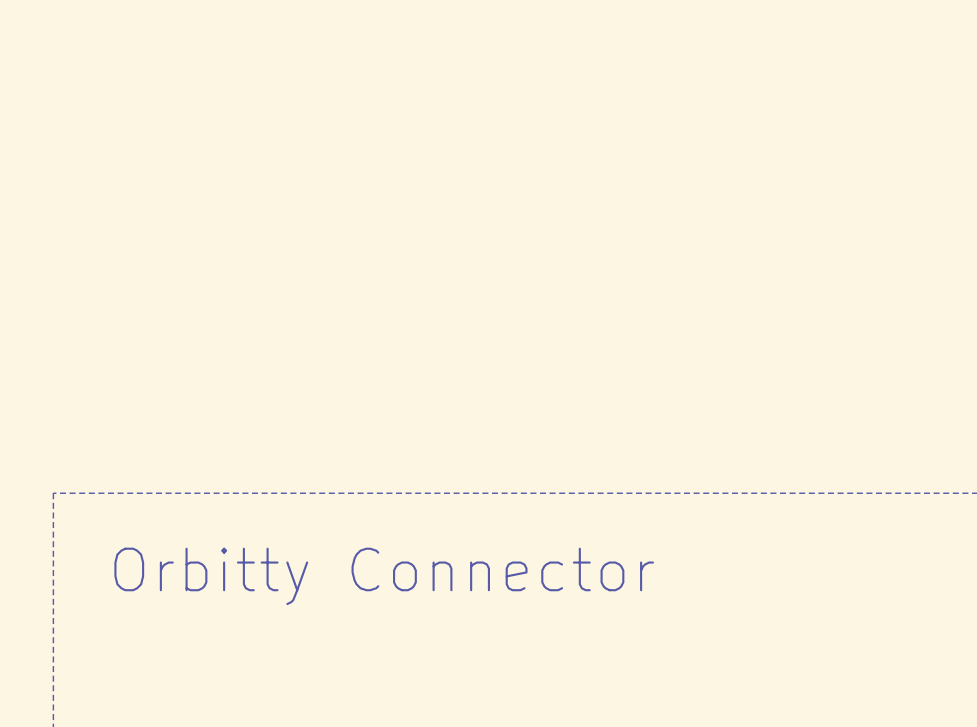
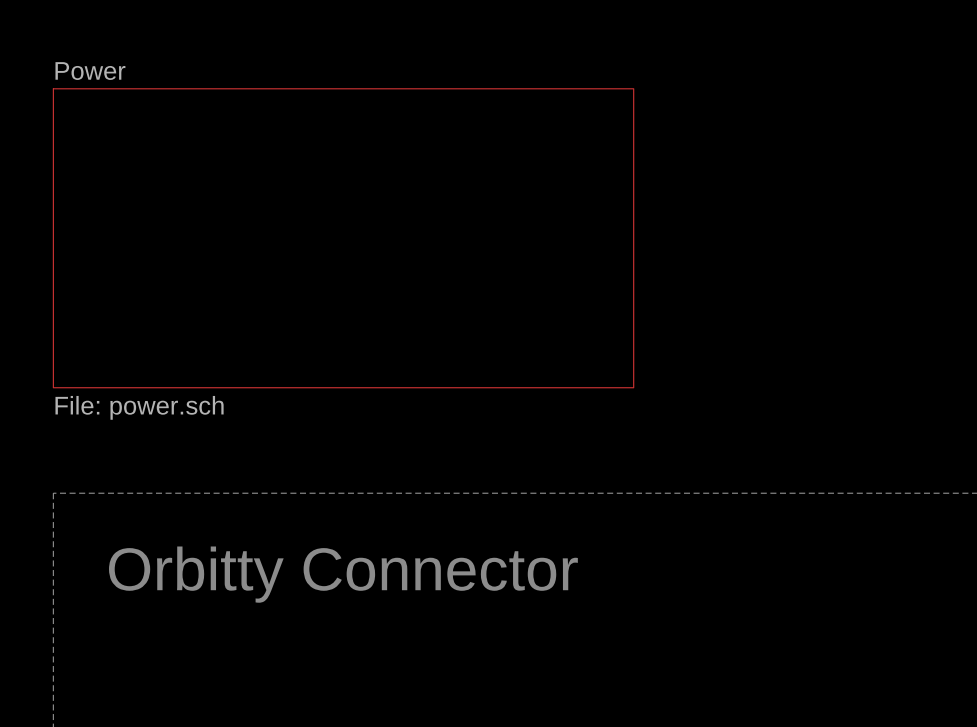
sheet Power: none -> File: power.sch (343, 238)

